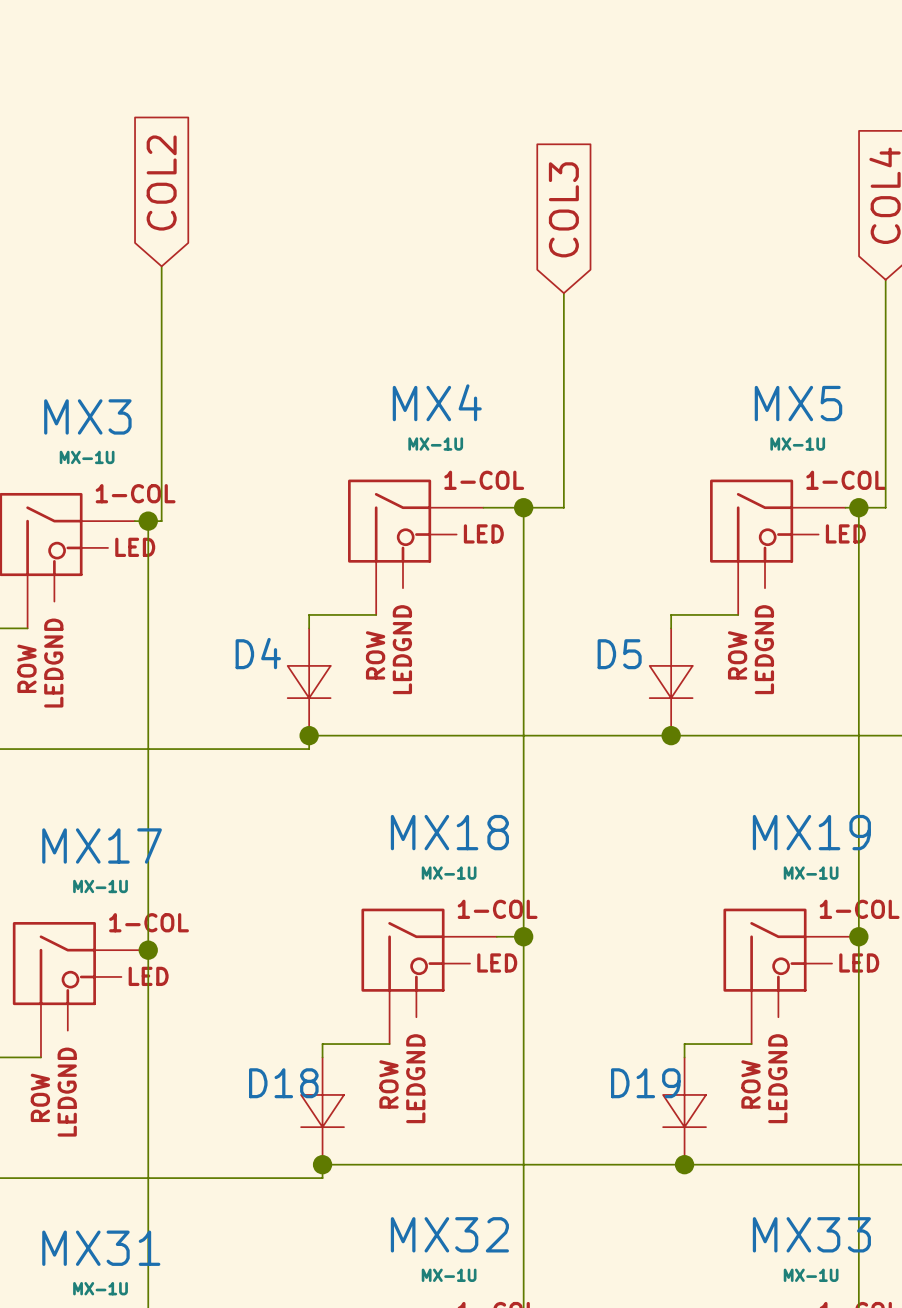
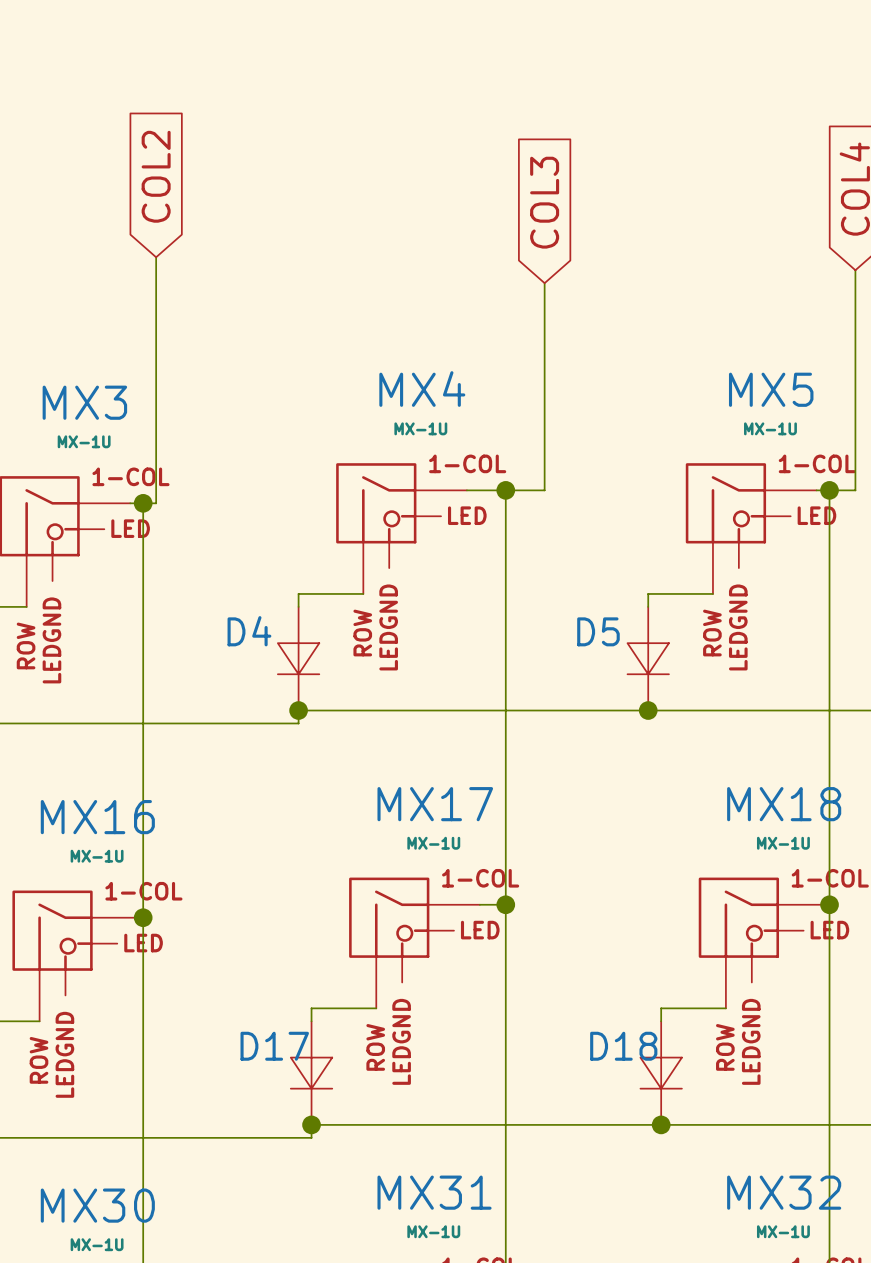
MX18 name: MX18 (449, 832) -> MX17 (435, 804)
MX19 name: MX19 (811, 832) -> MX18 (784, 804)
MX17 name: MX17 (102, 845) -> MX16 (97, 817)
D18 name: D18 (283, 1083) -> D17 (274, 1046)
D19 name: D19 (645, 1083) -> D18 (623, 1046)
MX32 name: MX32 (449, 1234) -> MX31 (434, 1192)
MX33 name: MX33 (811, 1234) -> MX32 (784, 1192)
MX31 name: MX31 (101, 1248) -> MX30 (97, 1205)

